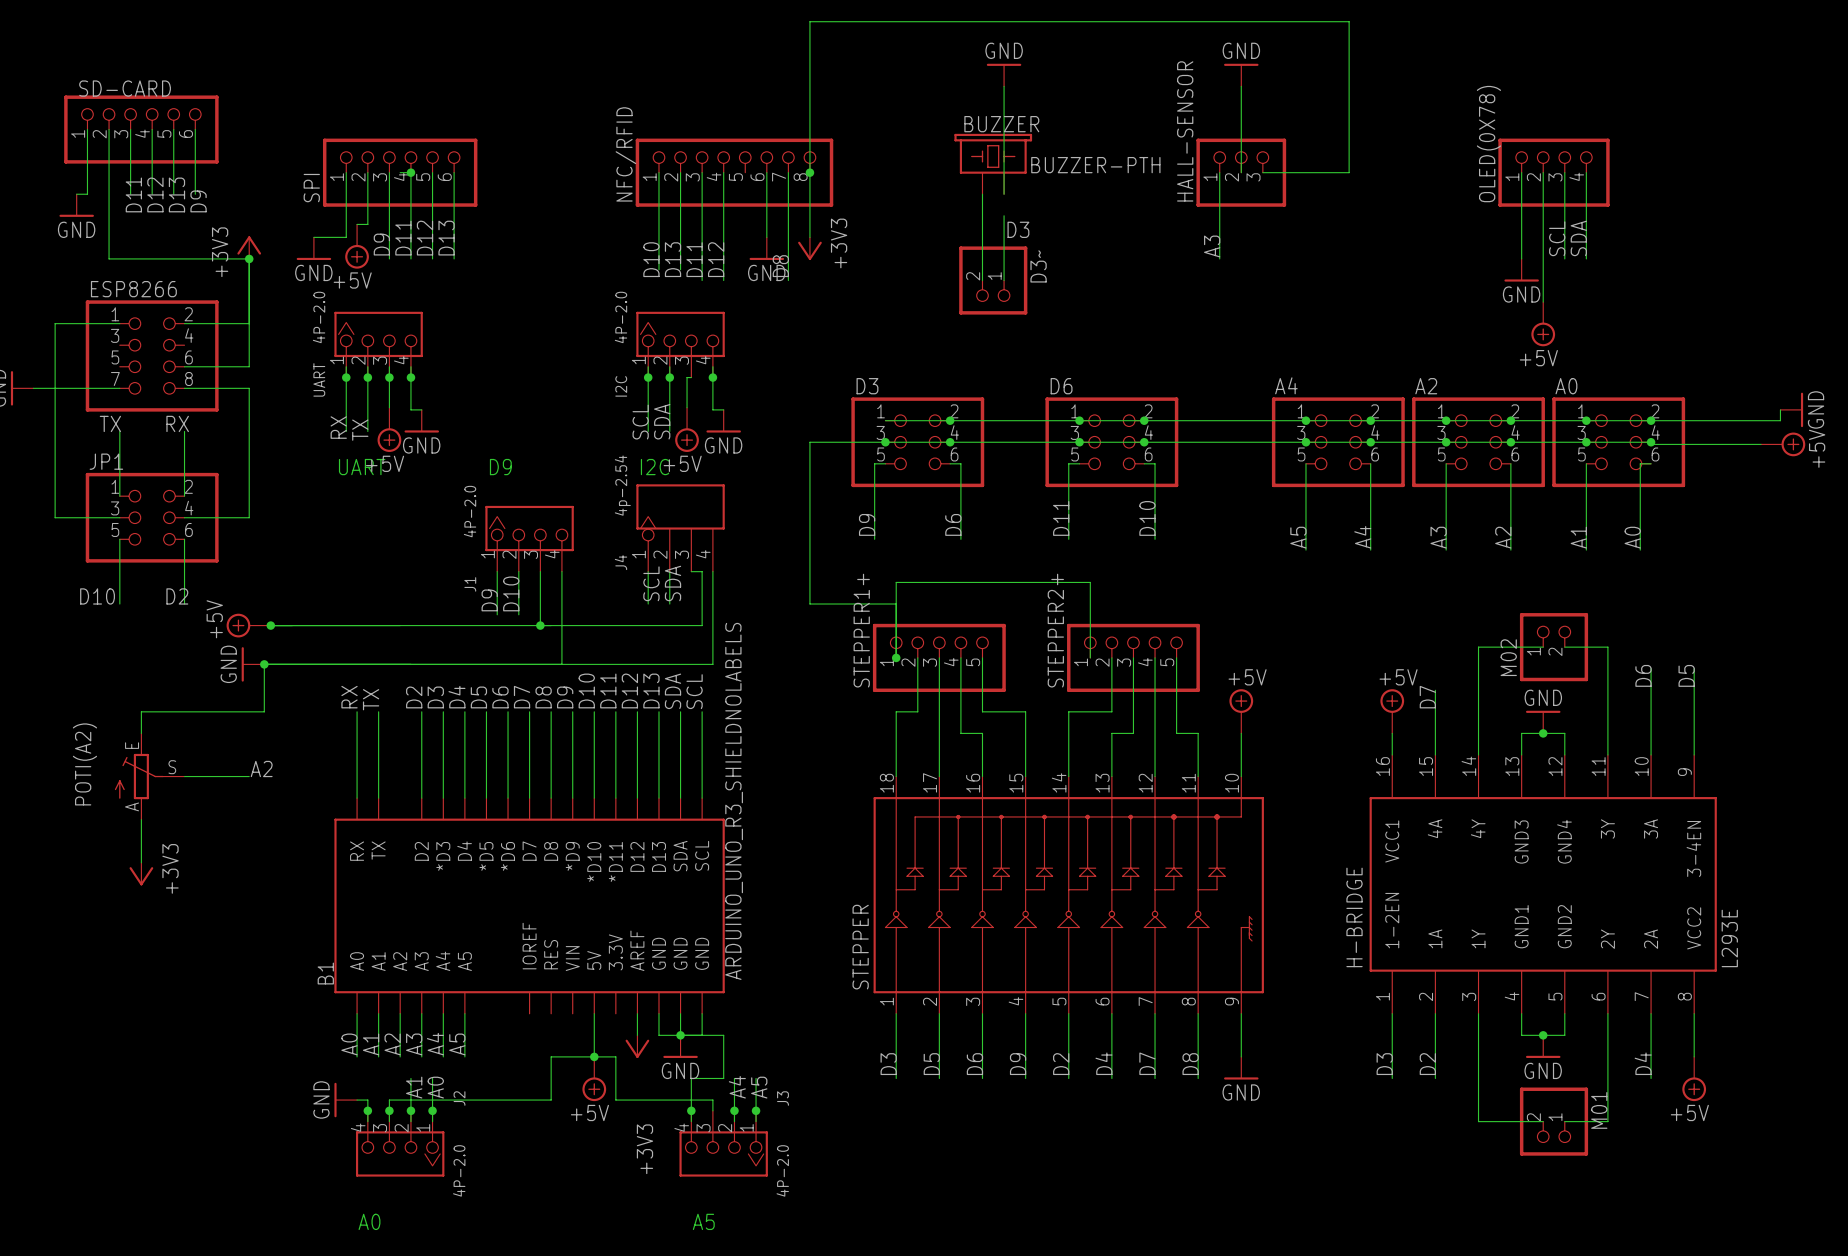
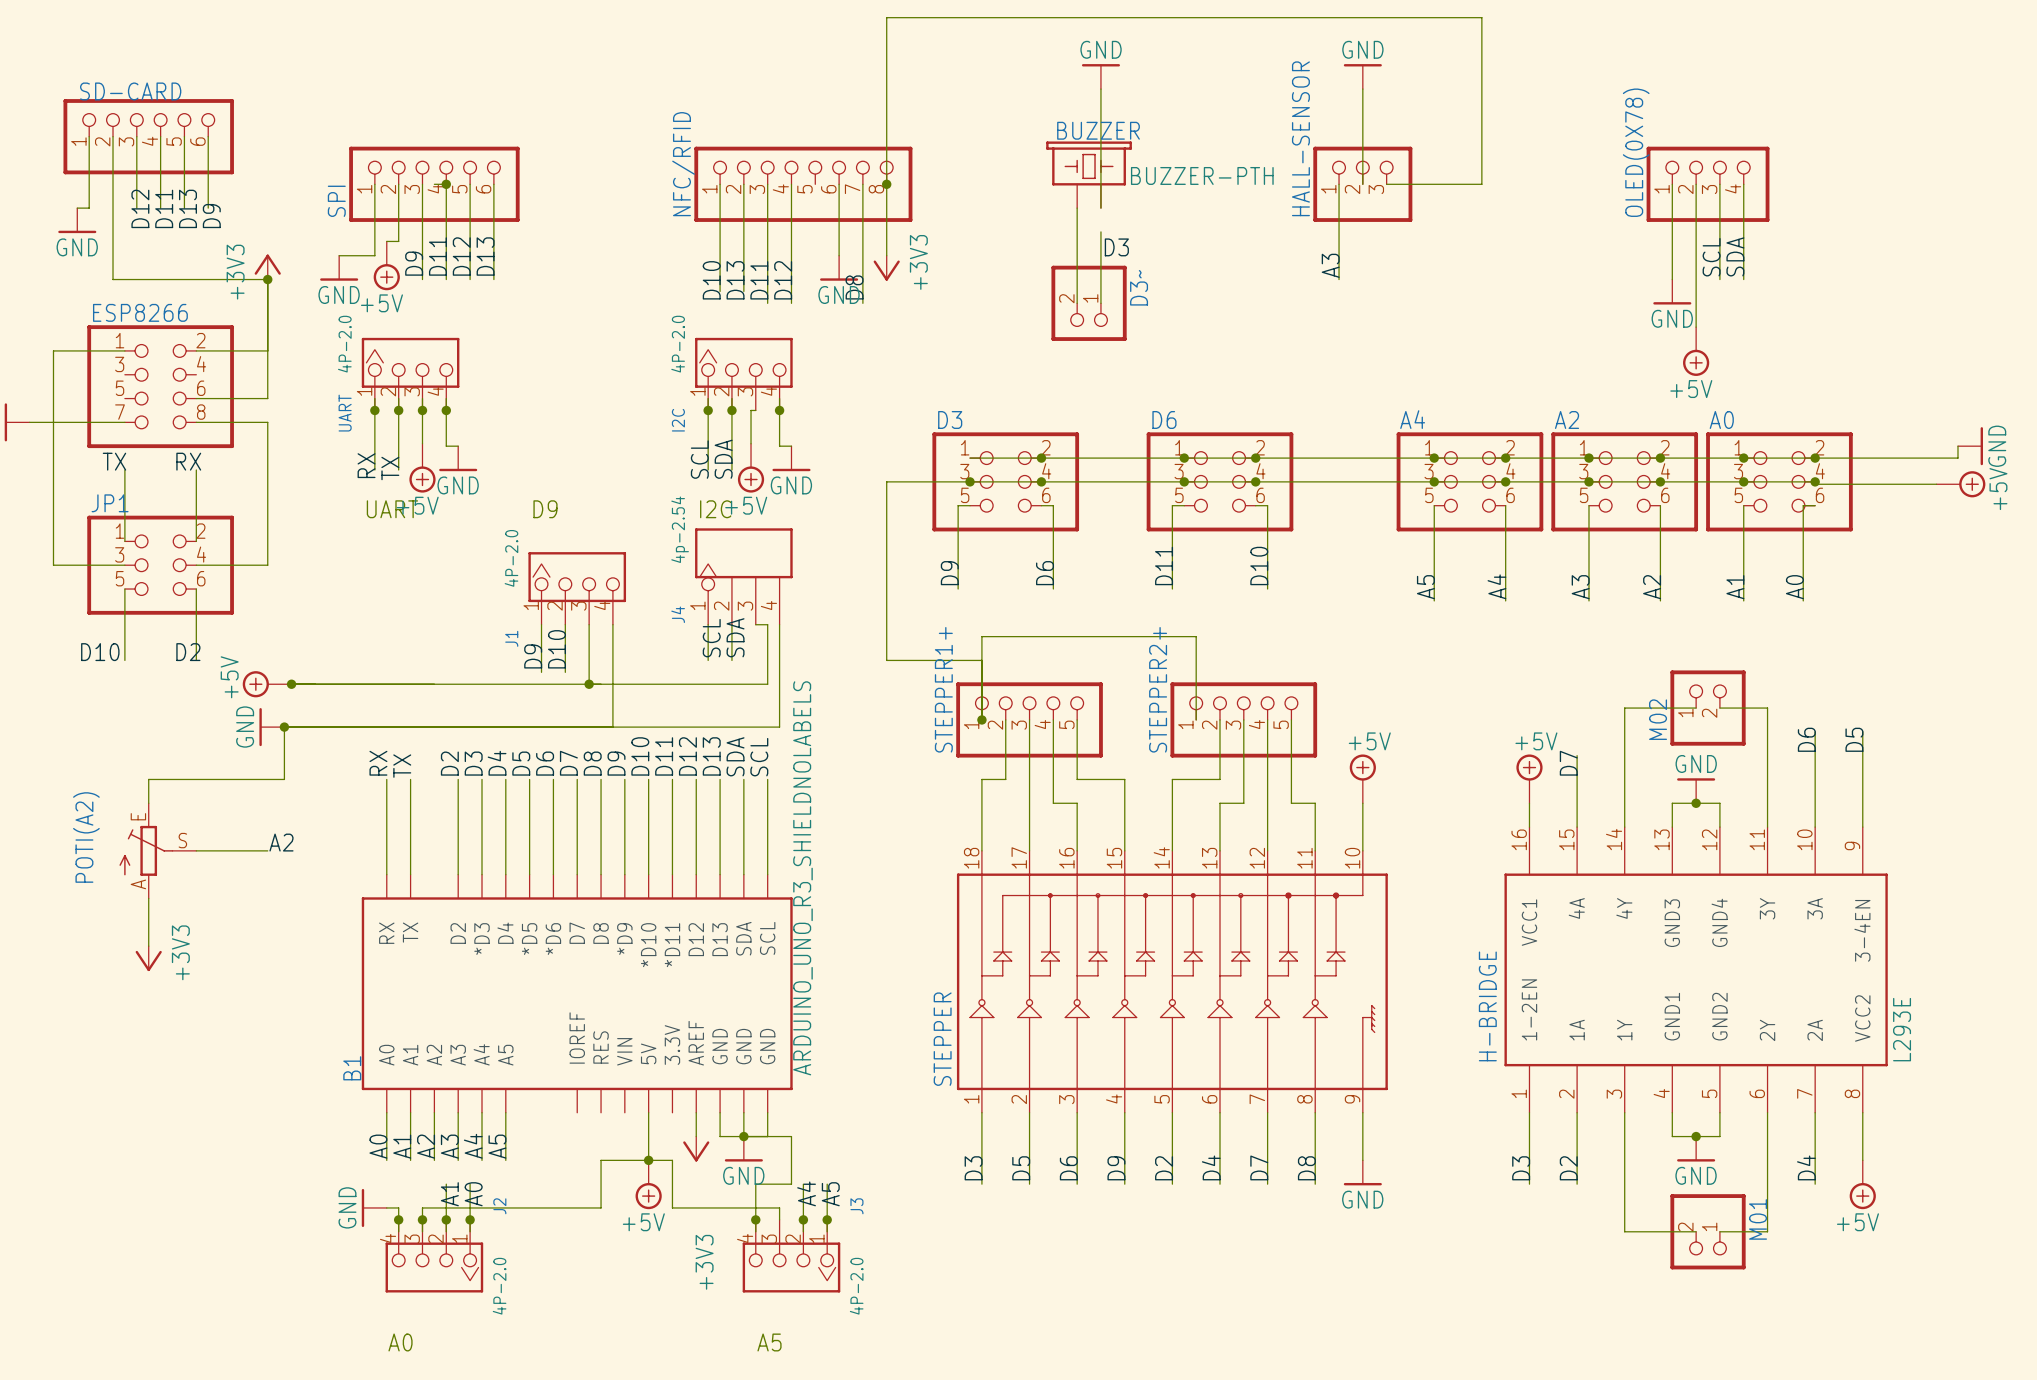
label: D11 (133, 194) -> D12 (140, 208)
label: D12 (155, 194) -> D11 (164, 208)

